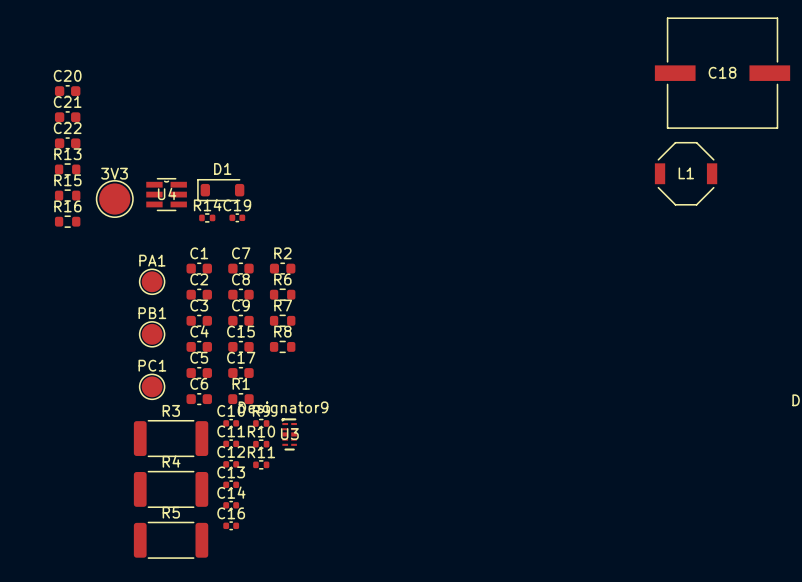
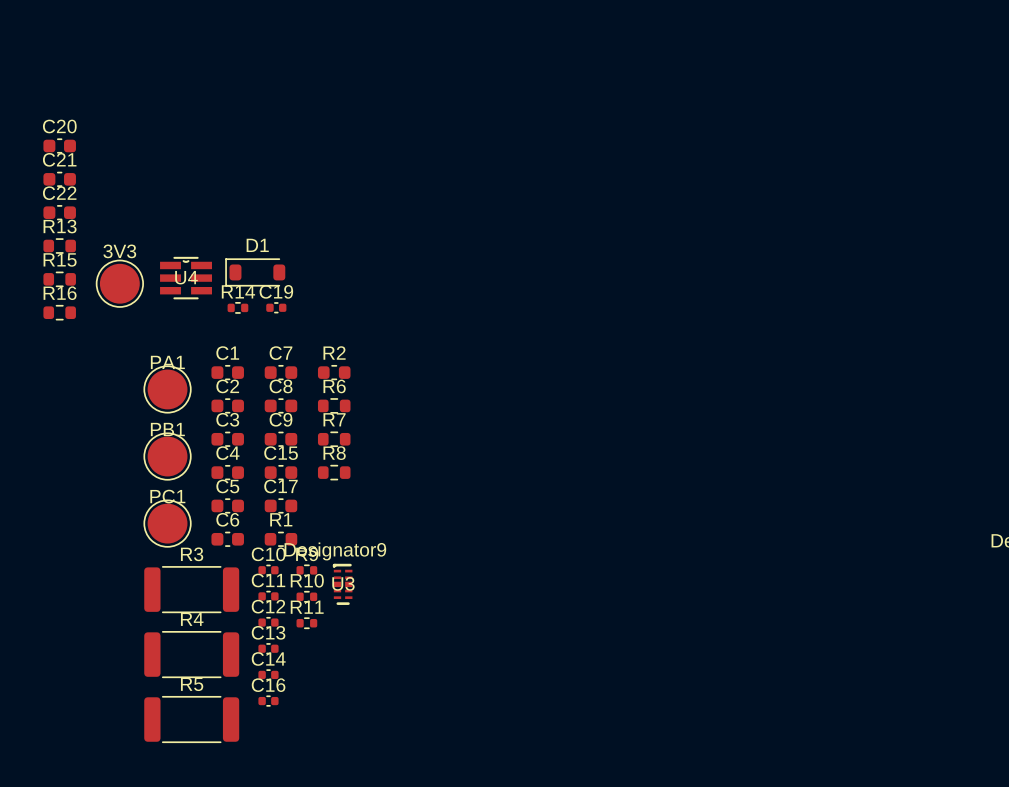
C18: (722, 73) -> none
L1: (686, 173) -> none
PA1 footprint: [139, 268, 166, 295] -> [143, 365, 192, 414]
PB1 footprint: [139, 321, 166, 348] -> [143, 432, 192, 481]
PC1 footprint: [139, 373, 166, 400] -> [143, 499, 192, 548]

